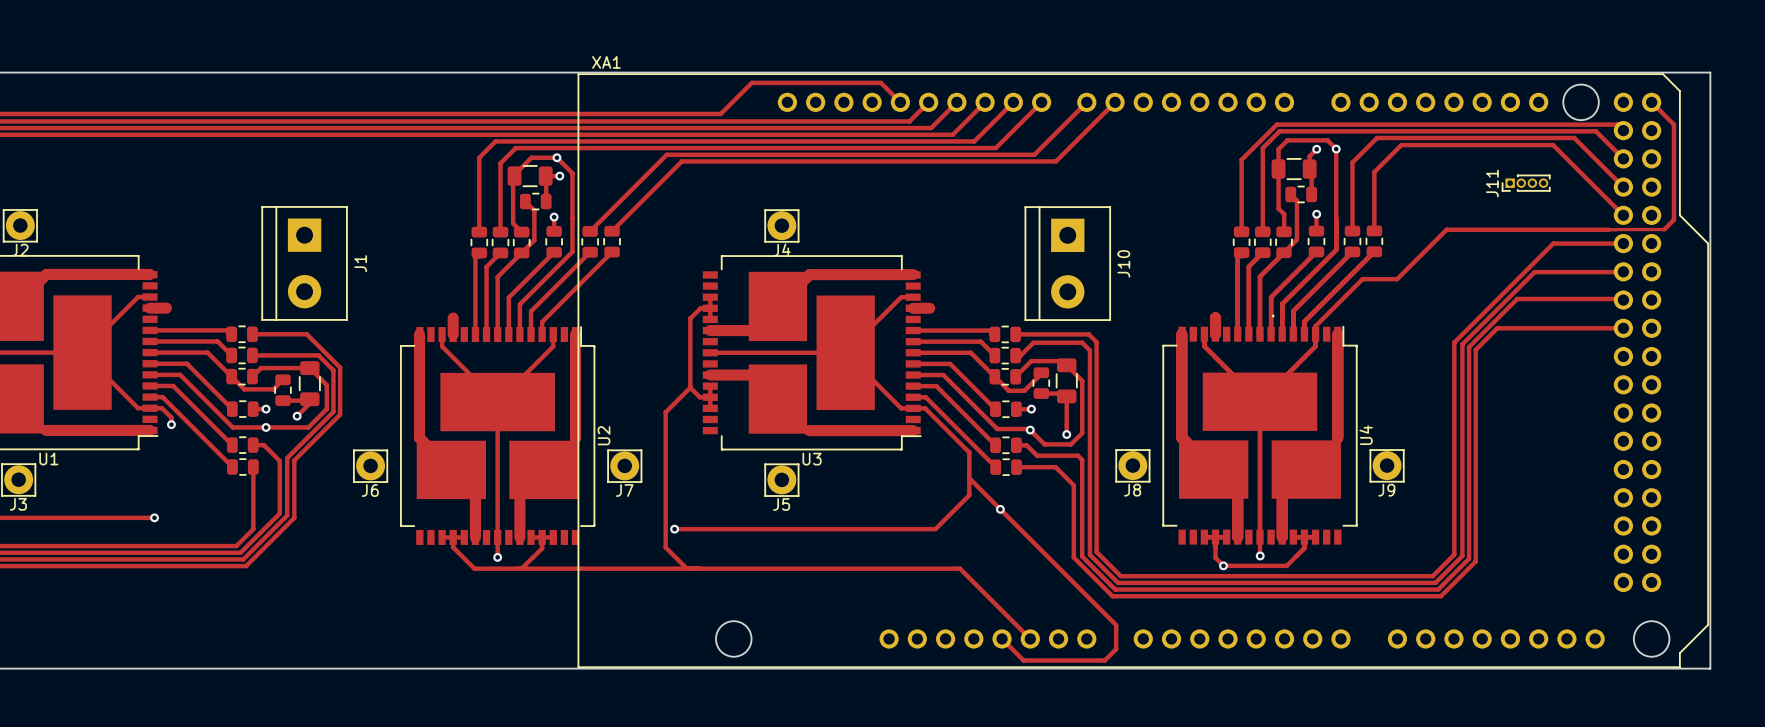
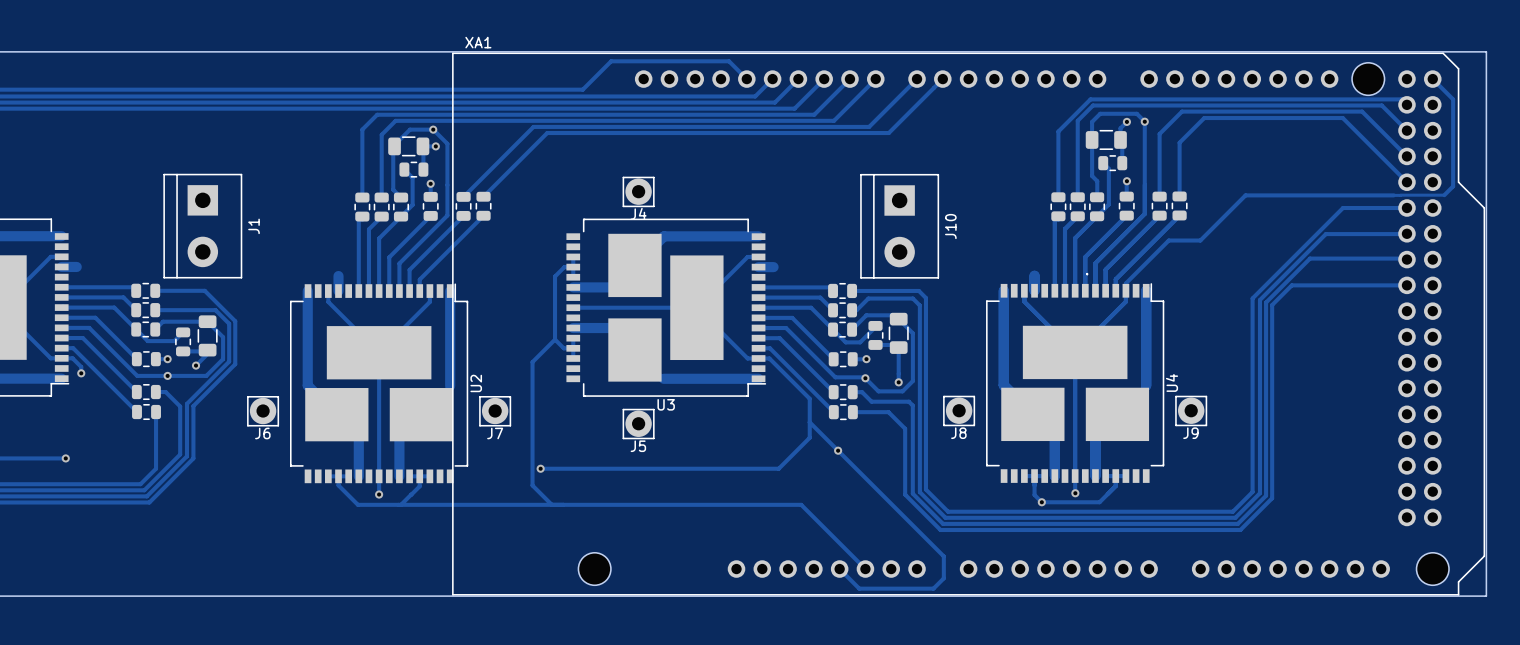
J11: (1526, 183) -> none

